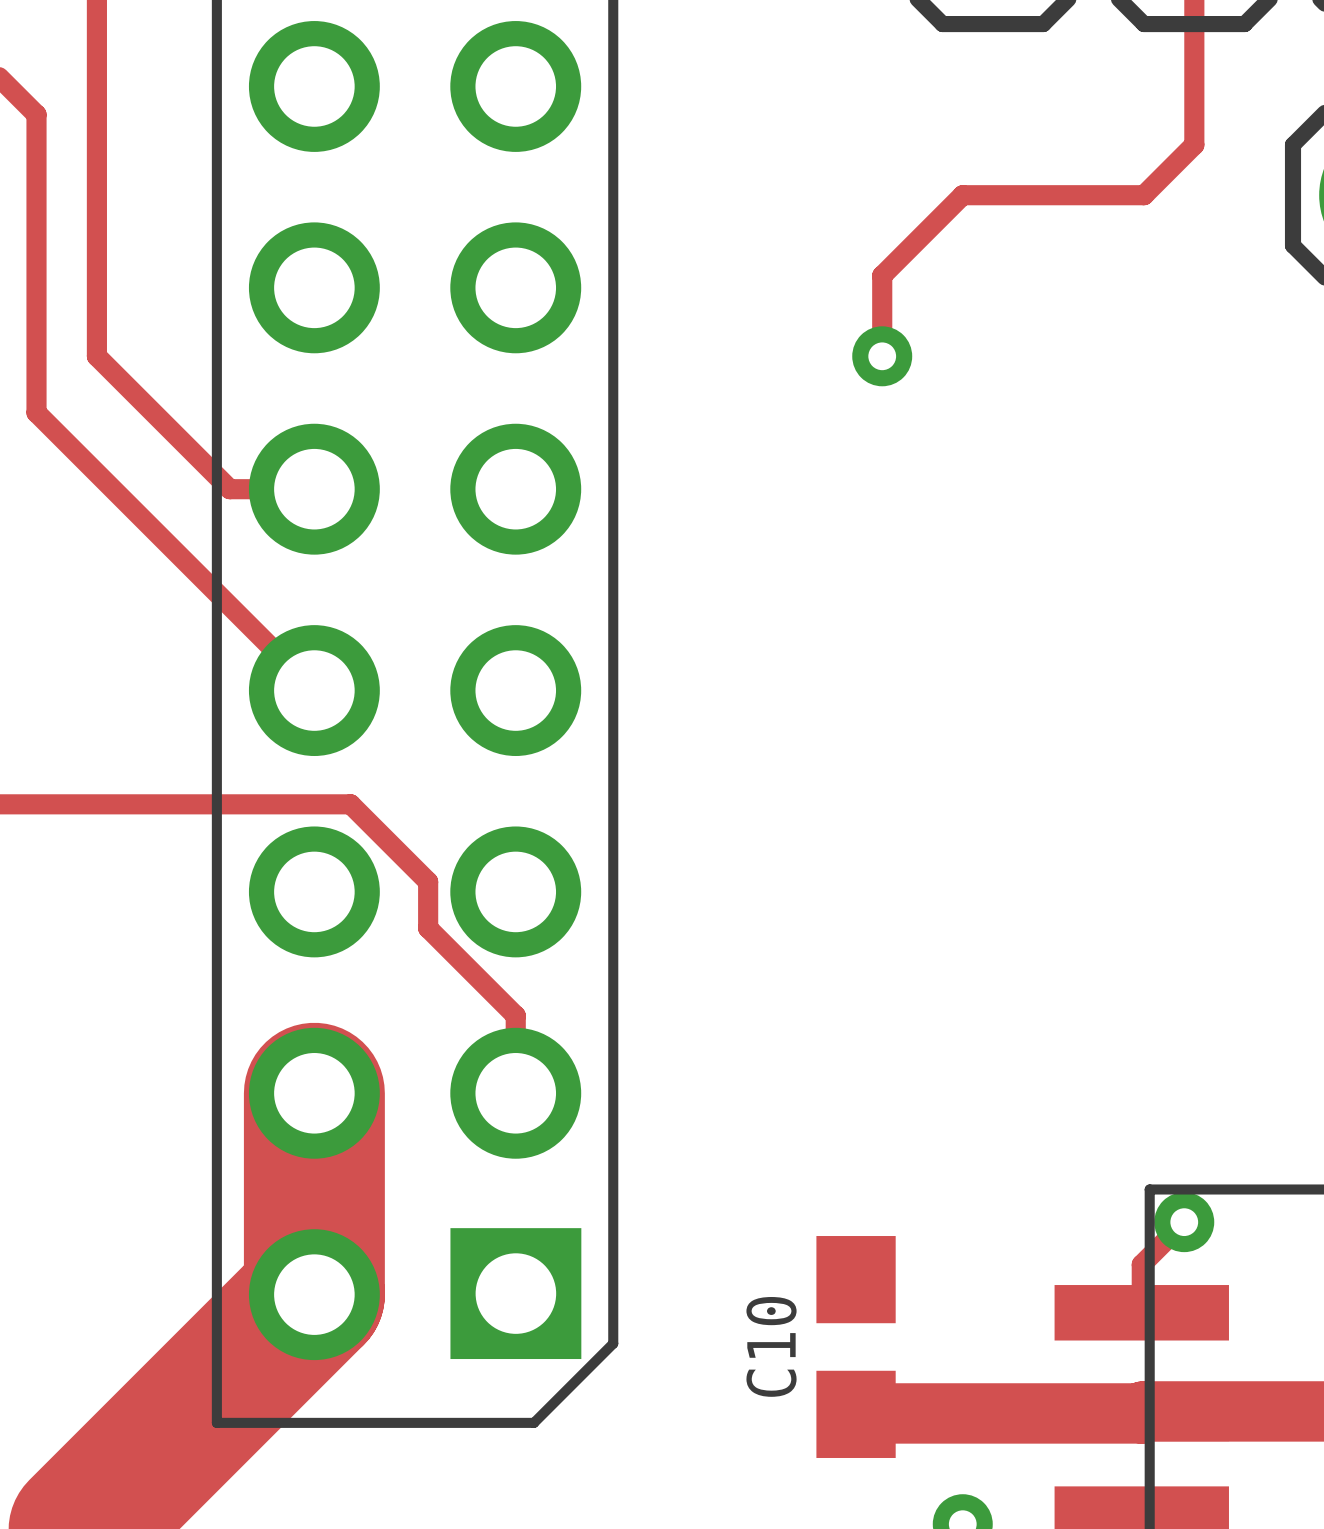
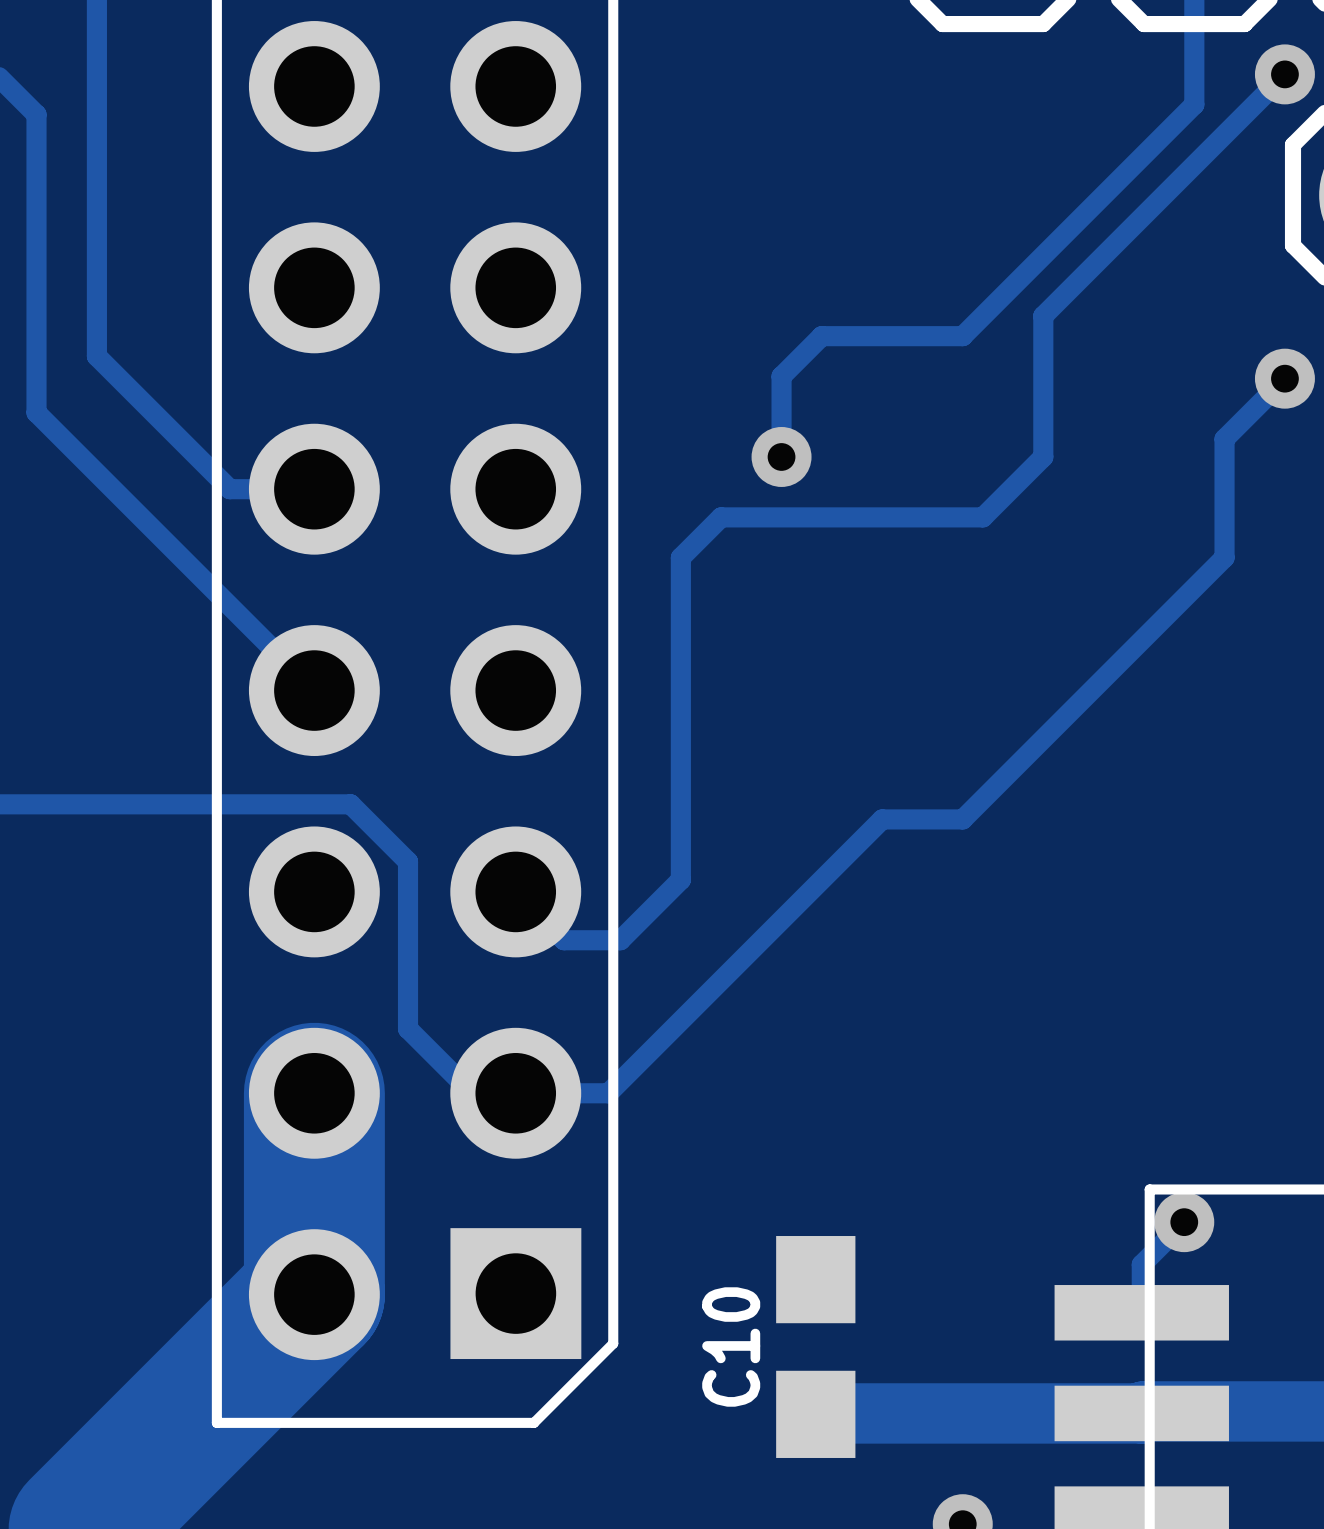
track: none -> (1284, 74) (1043, 316) (1043, 456) (982, 517) (721, 517) (680, 557) (680, 879) (620, 940) (564, 940) (515, 891)
via: none -> (1284, 74)
track: (1194, 104) (1194, 144) (1143, 195) (962, 195) (882, 275) (882, 356) -> (1194, 104) (962, 336) (821, 336) (781, 376) (781, 456)
via position: (882, 356) -> (781, 456)
via: none -> (1284, 378)
track: (408, 861) (428, 881) (428, 928) (515, 1015) (515, 1093) -> (408, 861) (408, 1028) (472, 1093) (608, 1093) (882, 819) (962, 819) (1224, 557) (1224, 439) (1284, 378)
C10 position: (856, 1346) -> (815, 1346)

